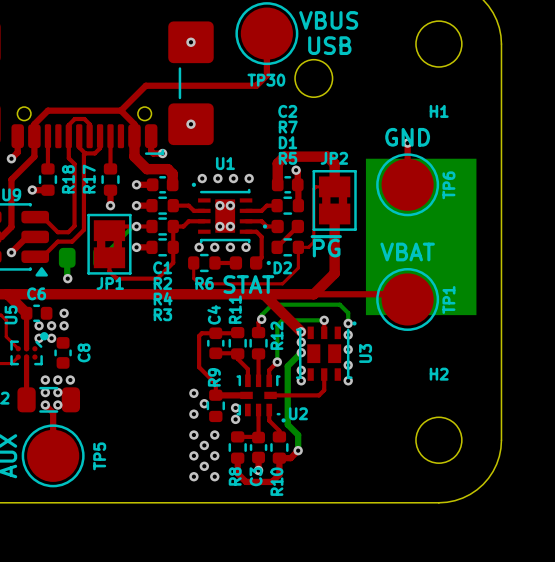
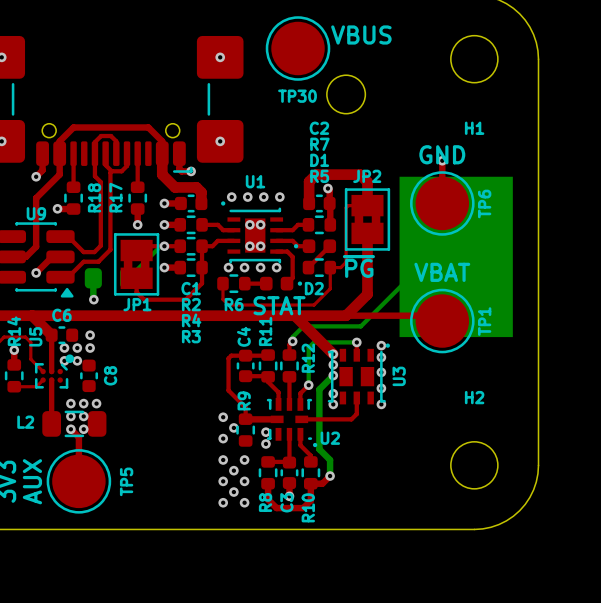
top track: (266, 33) (266, 75) (256, 85) (145, 85) (120, 110) -> none
text: USB (329, 45) -> none
bottom track: (328, 304) (339, 304) (348, 313) (348, 323) -> (360, 326) (424, 262)

